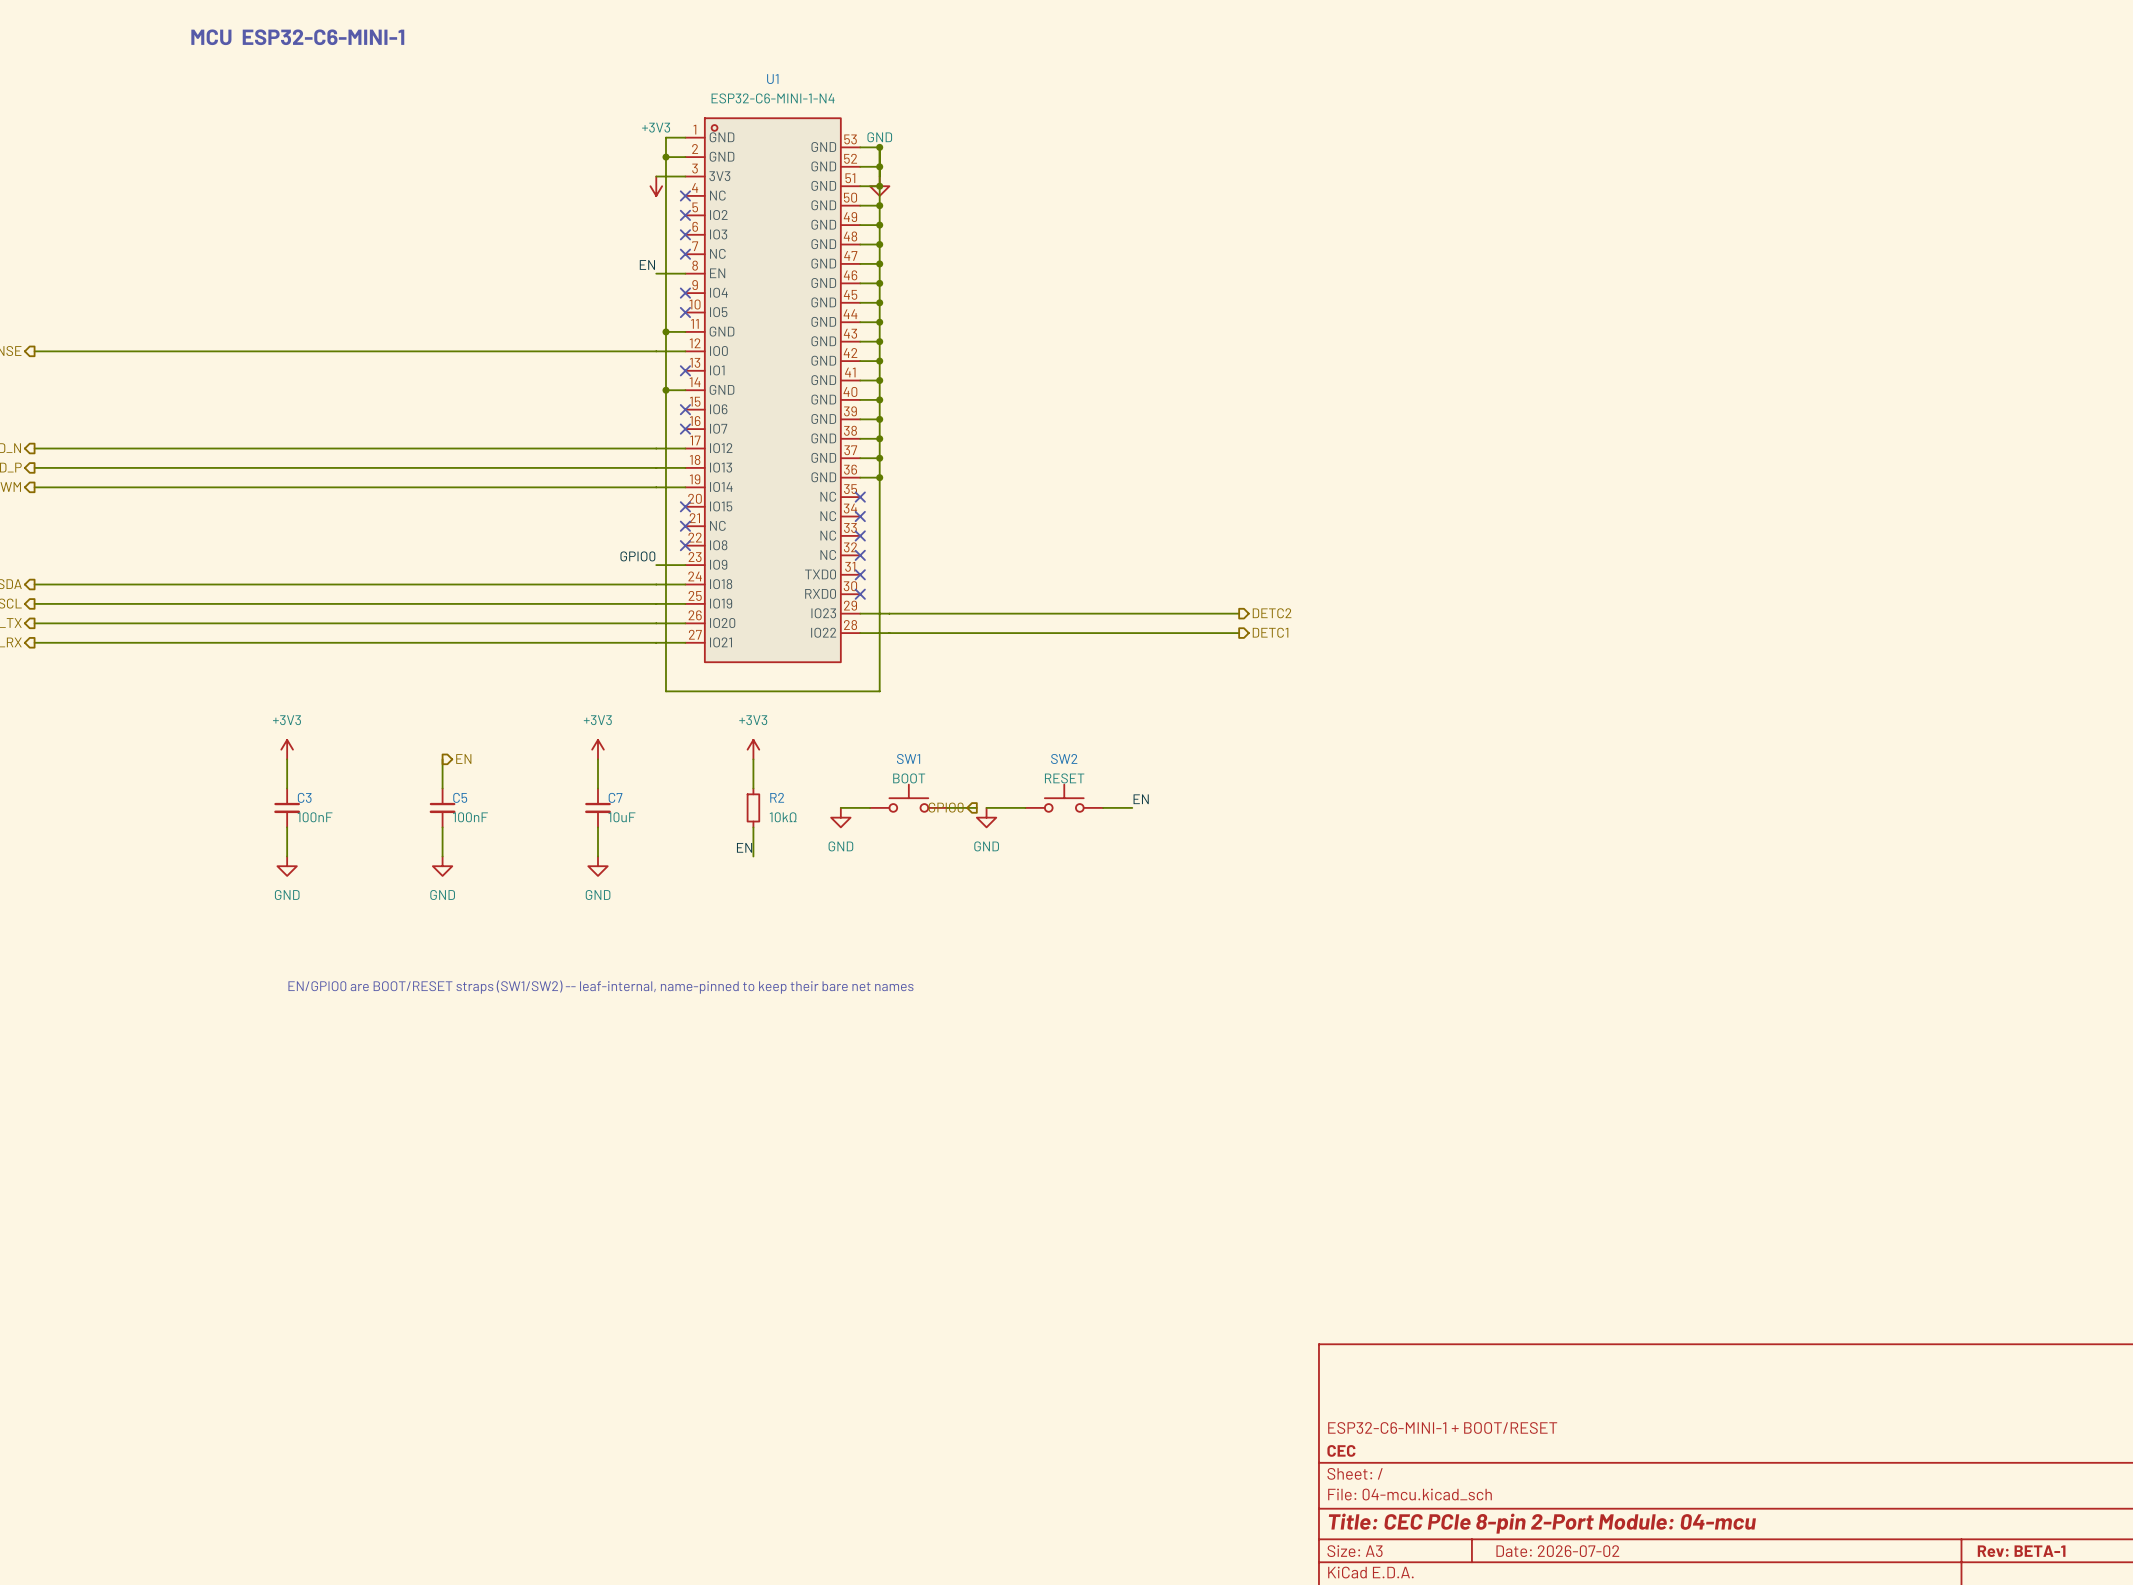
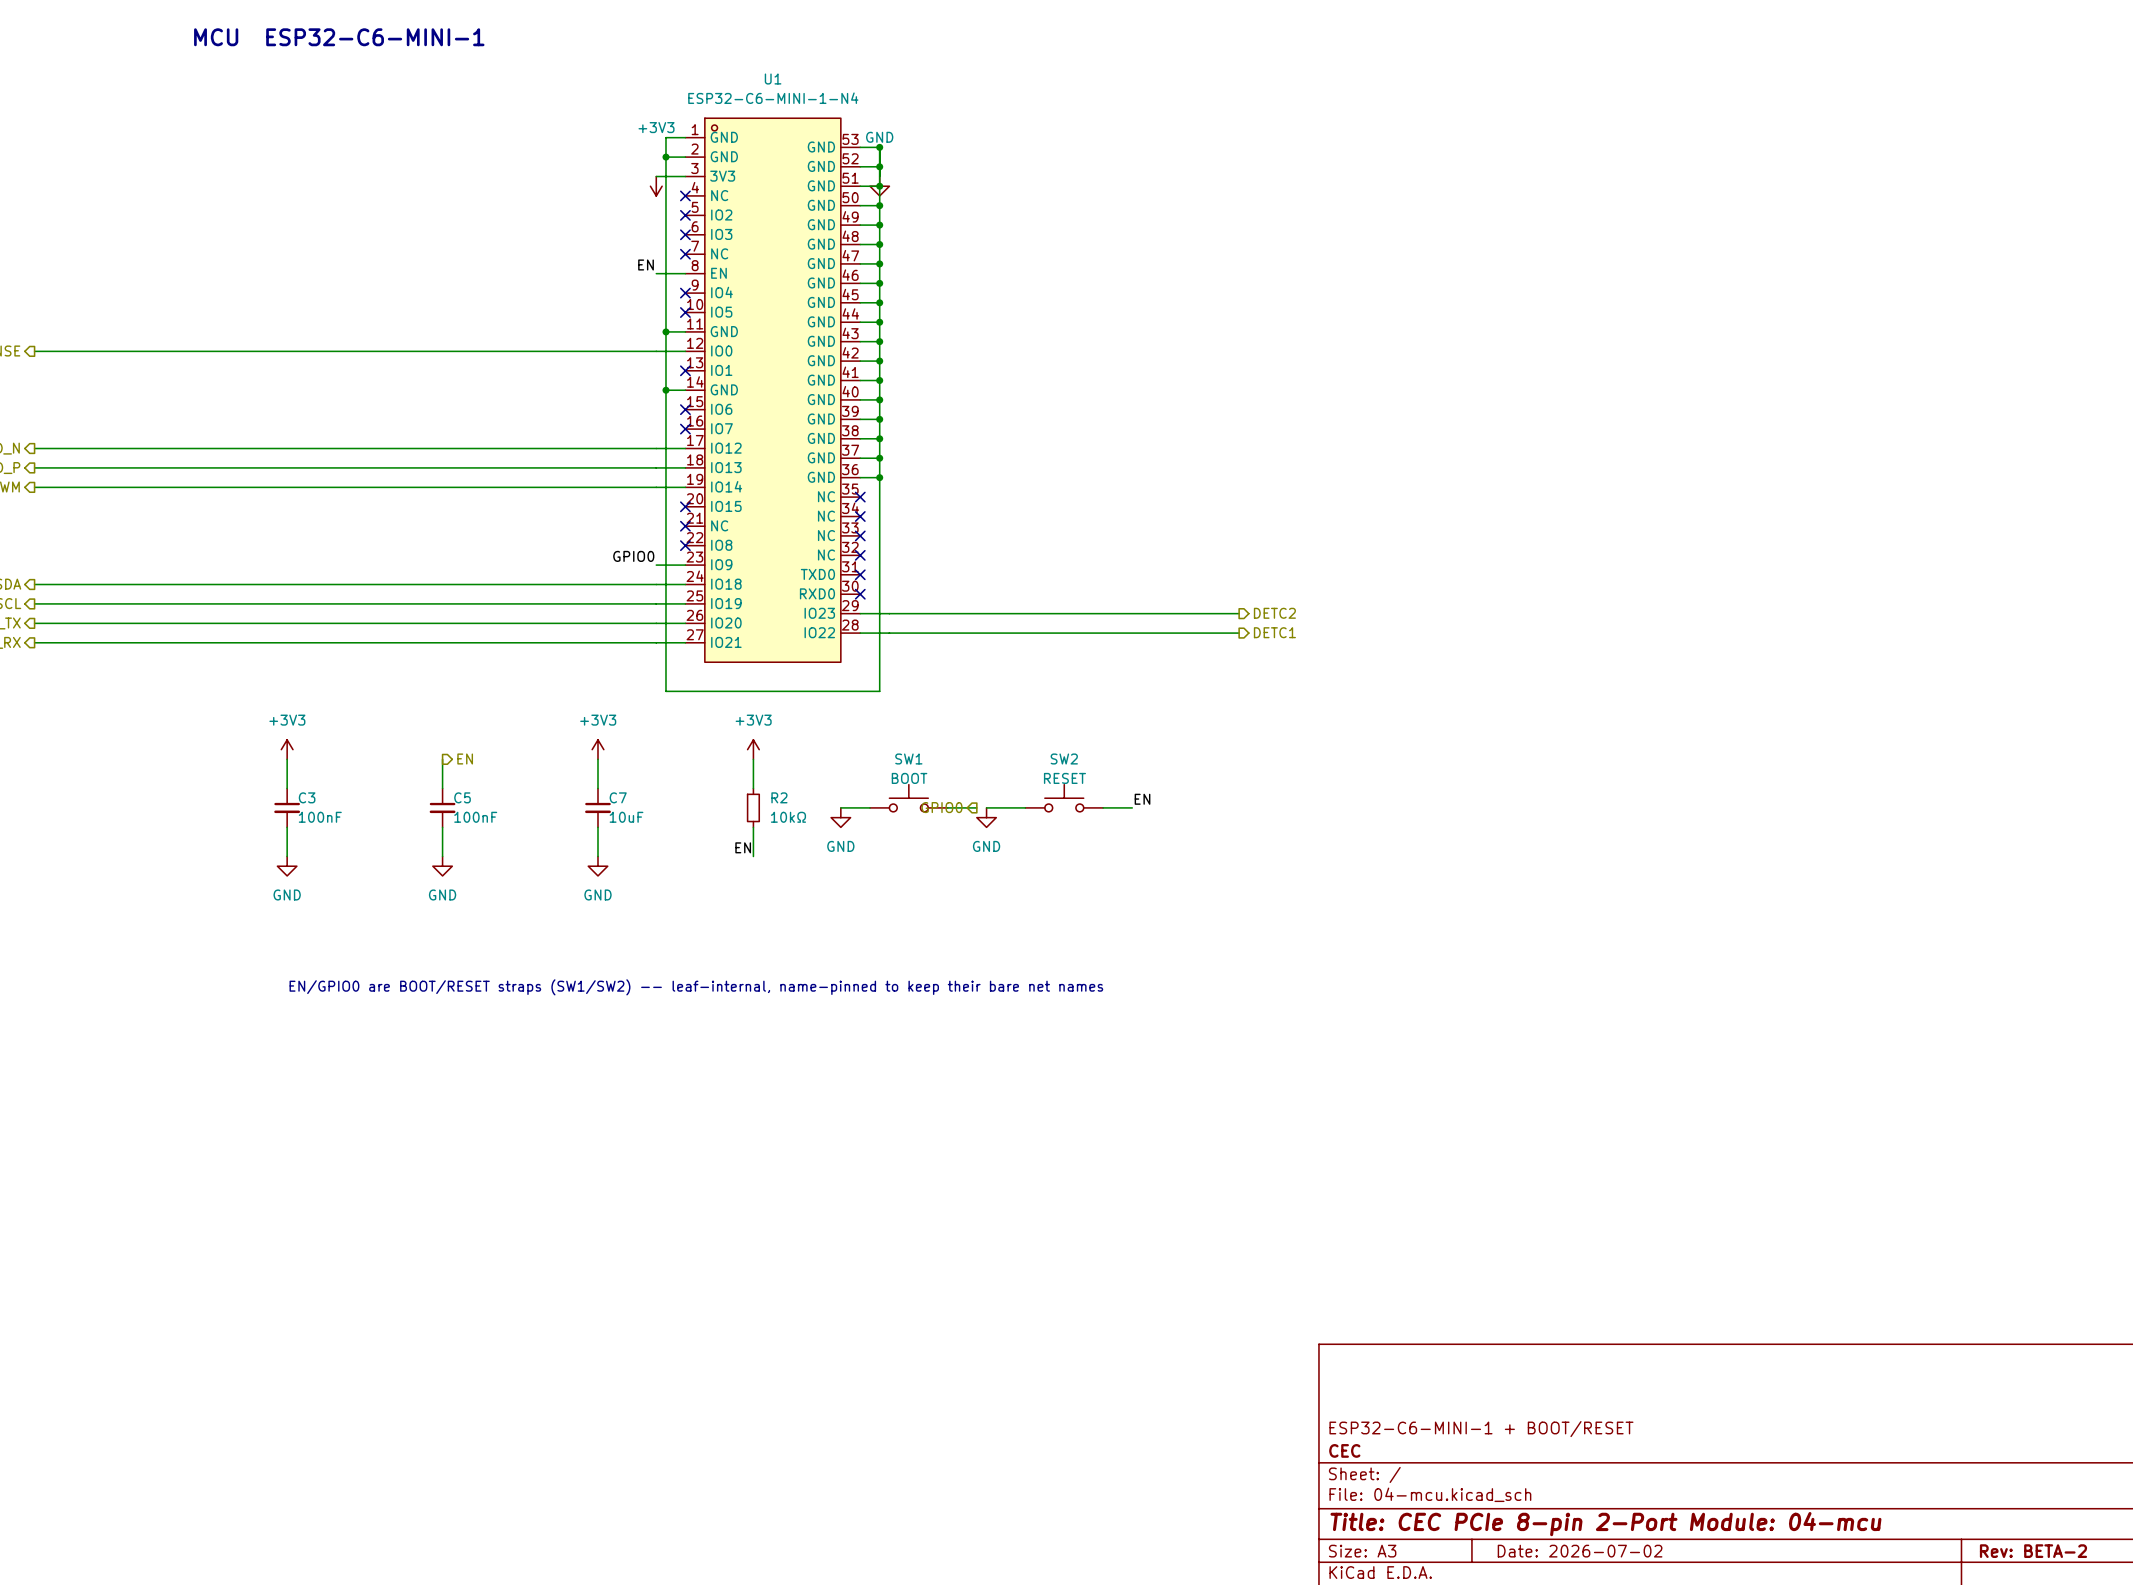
title block: Rev: BETA-1 (2021, 1551) -> Rev: BETA-2 (2033, 1551)

